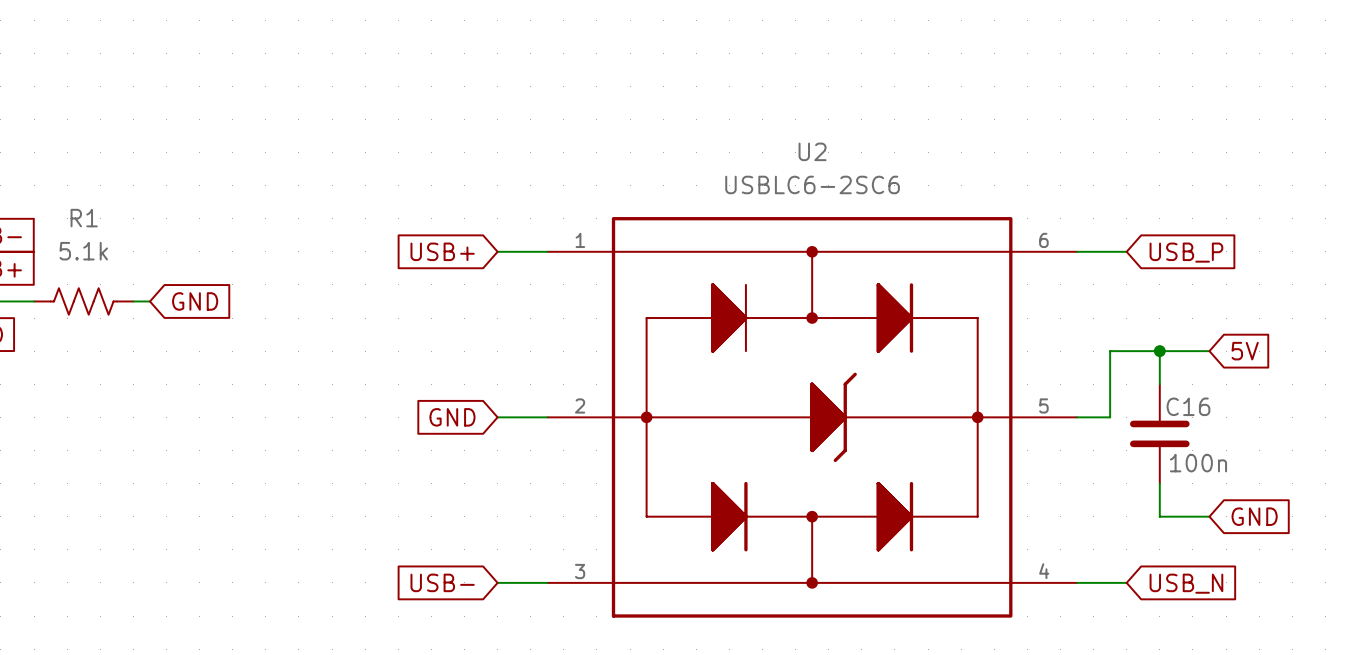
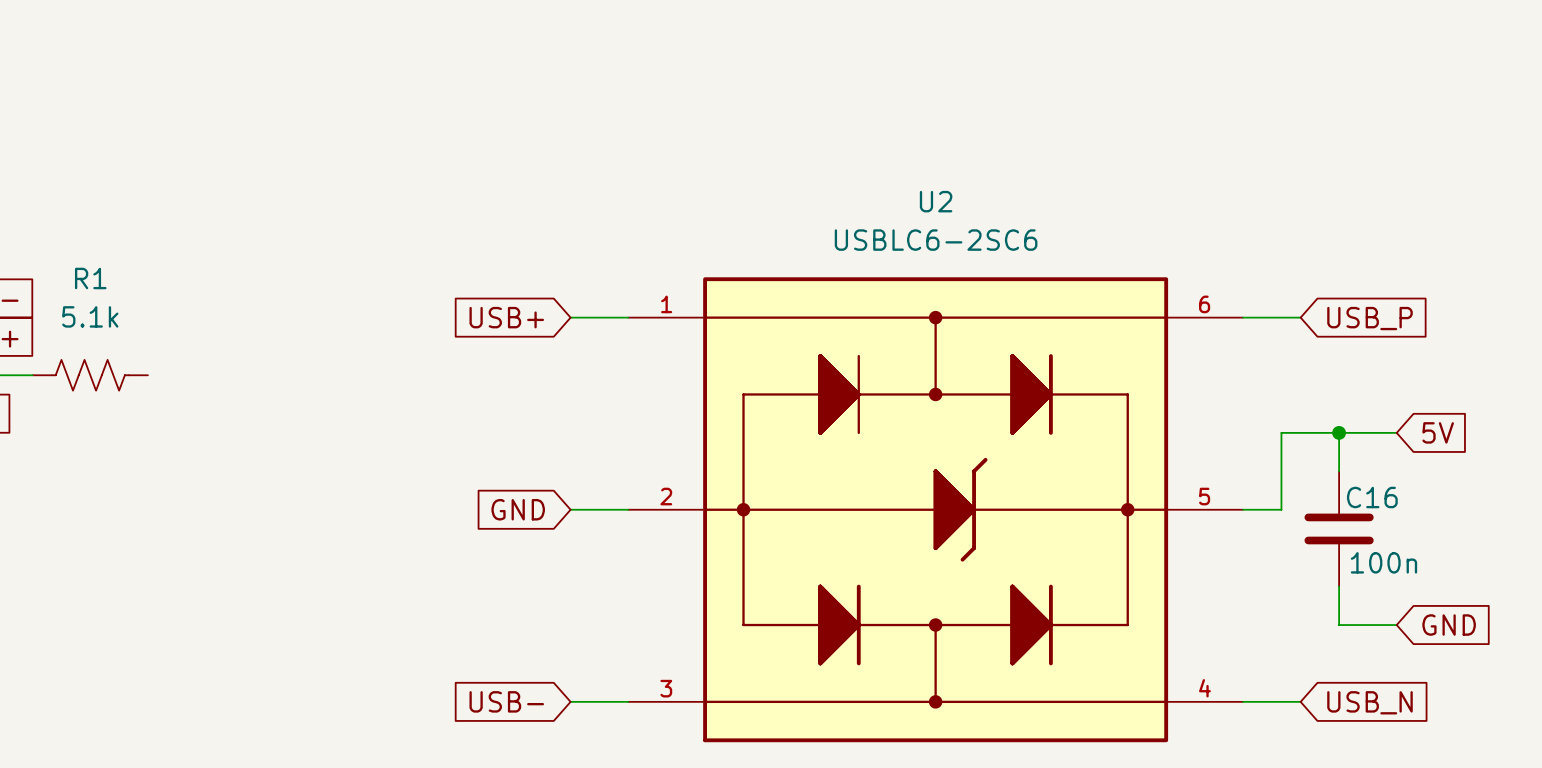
wire: (133, 301) (149, 301) -> none
global label: GND (195, 301) -> none

